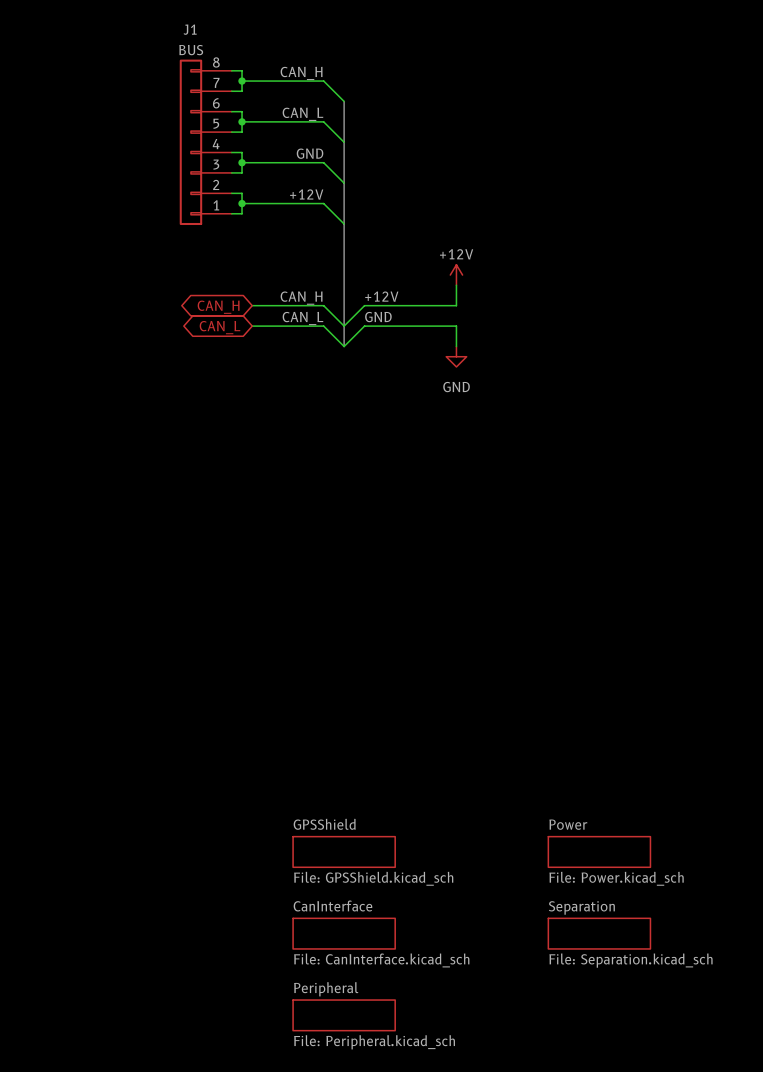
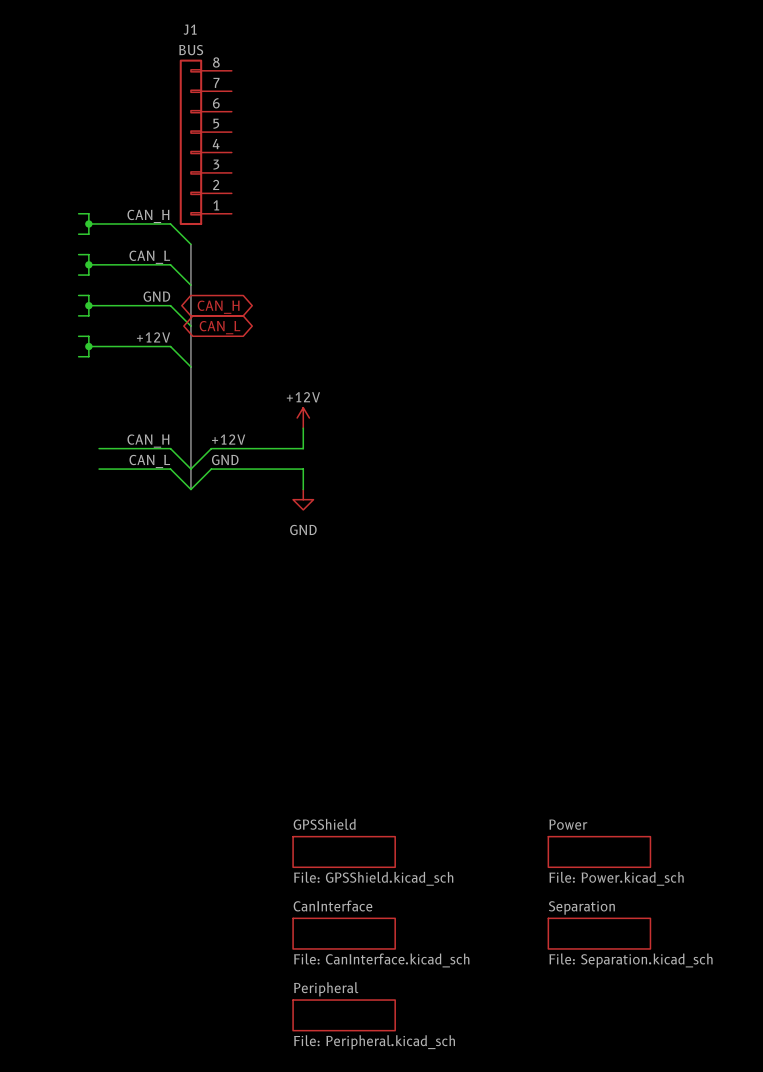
wire: (231, 70) (242, 70) (242, 91) (231, 91) -> none
label: CAN_H (301, 73) -> none
wire: (242, 81) (323, 81) (344, 101) -> none
junction: (242, 81) -> none
bus: (344, 101) (344, 346) -> none
wire: (231, 111) (242, 111) (242, 132) (231, 132) -> (78, 213) (88, 213) (88, 234) (78, 234)
label: CAN_L (302, 114) -> none
wire: (242, 121) (323, 121) (344, 142) -> (88, 223) (170, 223) (190, 244)
junction: (242, 121) -> none
wire: (231, 152) (242, 152) (242, 172) (231, 172) -> (78, 254) (88, 254) (88, 275) (78, 275)
label: GND (310, 153) -> none
wire: (242, 162) (323, 162) (344, 183) -> (88, 264) (170, 264) (190, 285)
junction: (242, 162) -> none
wire: (231, 193) (242, 193) (242, 213) (231, 213) -> (78, 295) (88, 295) (88, 315) (78, 315)
label: +12V (306, 194) -> none
wire: (242, 203) (323, 203) (344, 223) -> (88, 305) (170, 305) (190, 326)
junction: (242, 203) -> none
label: none -> CAN_H (148, 216)
junction: none -> (88, 223)
bus: none -> (190, 244) (190, 489)
label: none -> CAN_L (149, 257)
junction: none -> (88, 264)
power symbol: +12V (456, 275) -> none
wire: (456, 285) (456, 305) (364, 305) (344, 326) (323, 305) (252, 305) -> none
label: none -> GND (156, 296)
label: +12V (381, 296) -> none
label: CAN_H (301, 298) -> none
junction: none -> (88, 305)
label: GND (378, 317) -> none
label: CAN_L (302, 318) -> none
wire: (252, 326) (323, 326) (344, 346) (364, 326) (456, 326) (456, 346) -> none
wire: none -> (78, 336) (88, 336) (88, 356) (78, 356)
label: none -> +12V (153, 337)
wire: none -> (88, 346) (170, 346) (190, 366)
junction: none -> (88, 346)
power symbol: GND (456, 356) -> none
power symbol: none -> +12V (303, 418)
wire: none -> (303, 428) (303, 448) (211, 448) (190, 469) (170, 448) (99, 448)
label: none -> +12V (228, 439)
label: none -> CAN_H (148, 441)
label: none -> GND (225, 460)
label: none -> CAN_L (149, 461)
wire: none -> (99, 469) (170, 469) (190, 489) (211, 469) (303, 469) (303, 489)
power symbol: none -> GND (303, 499)

